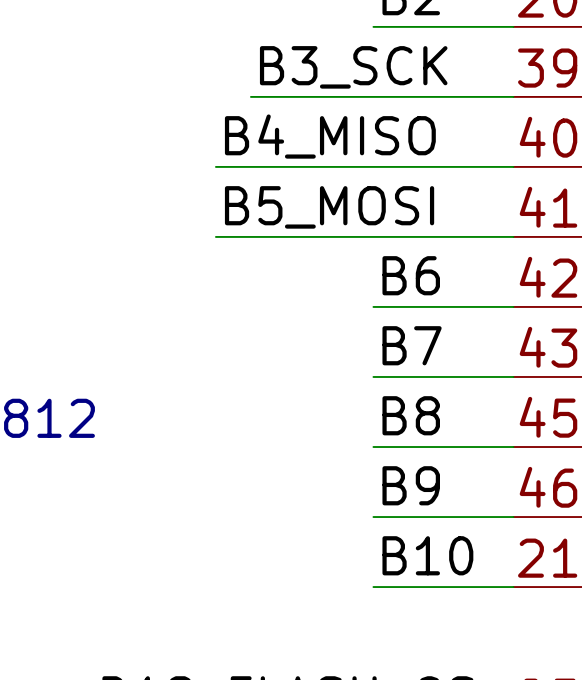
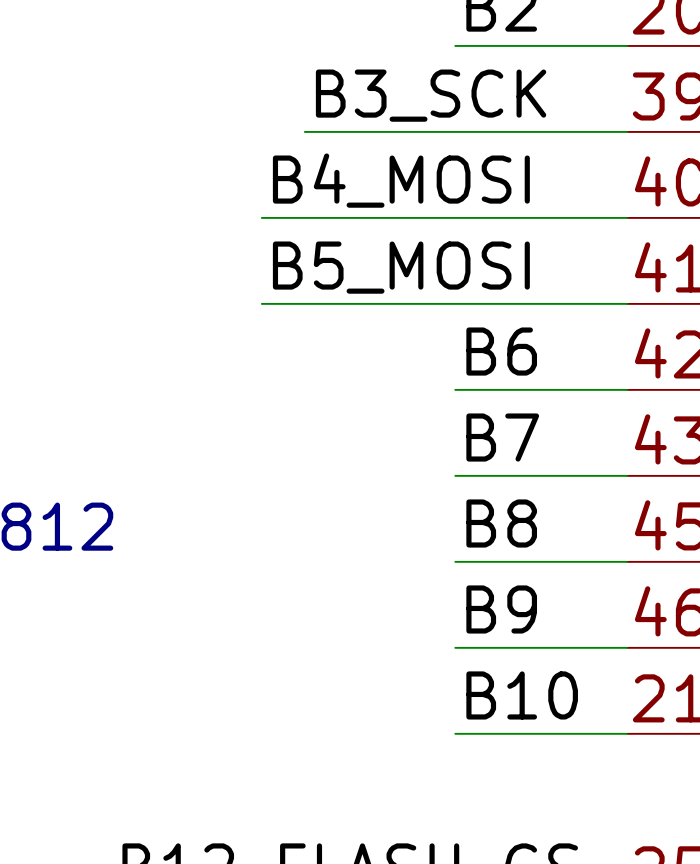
label: B4_MISO (330, 136) -> B4_MOSI (401, 180)

